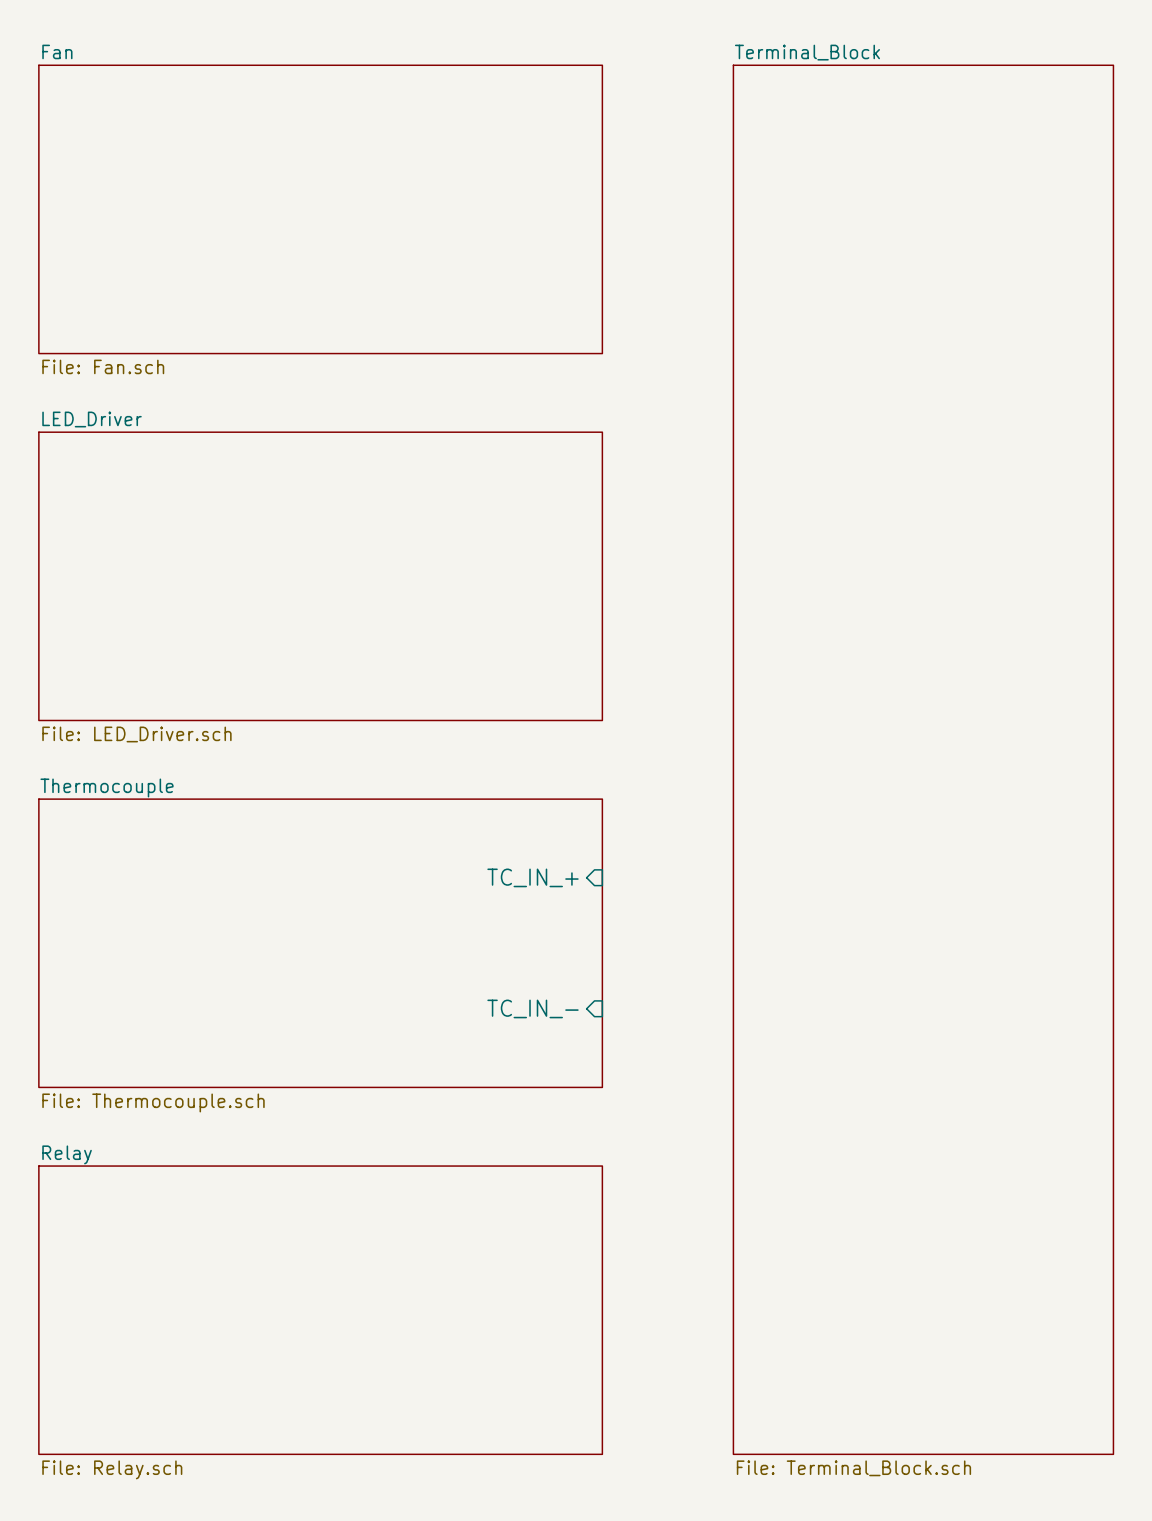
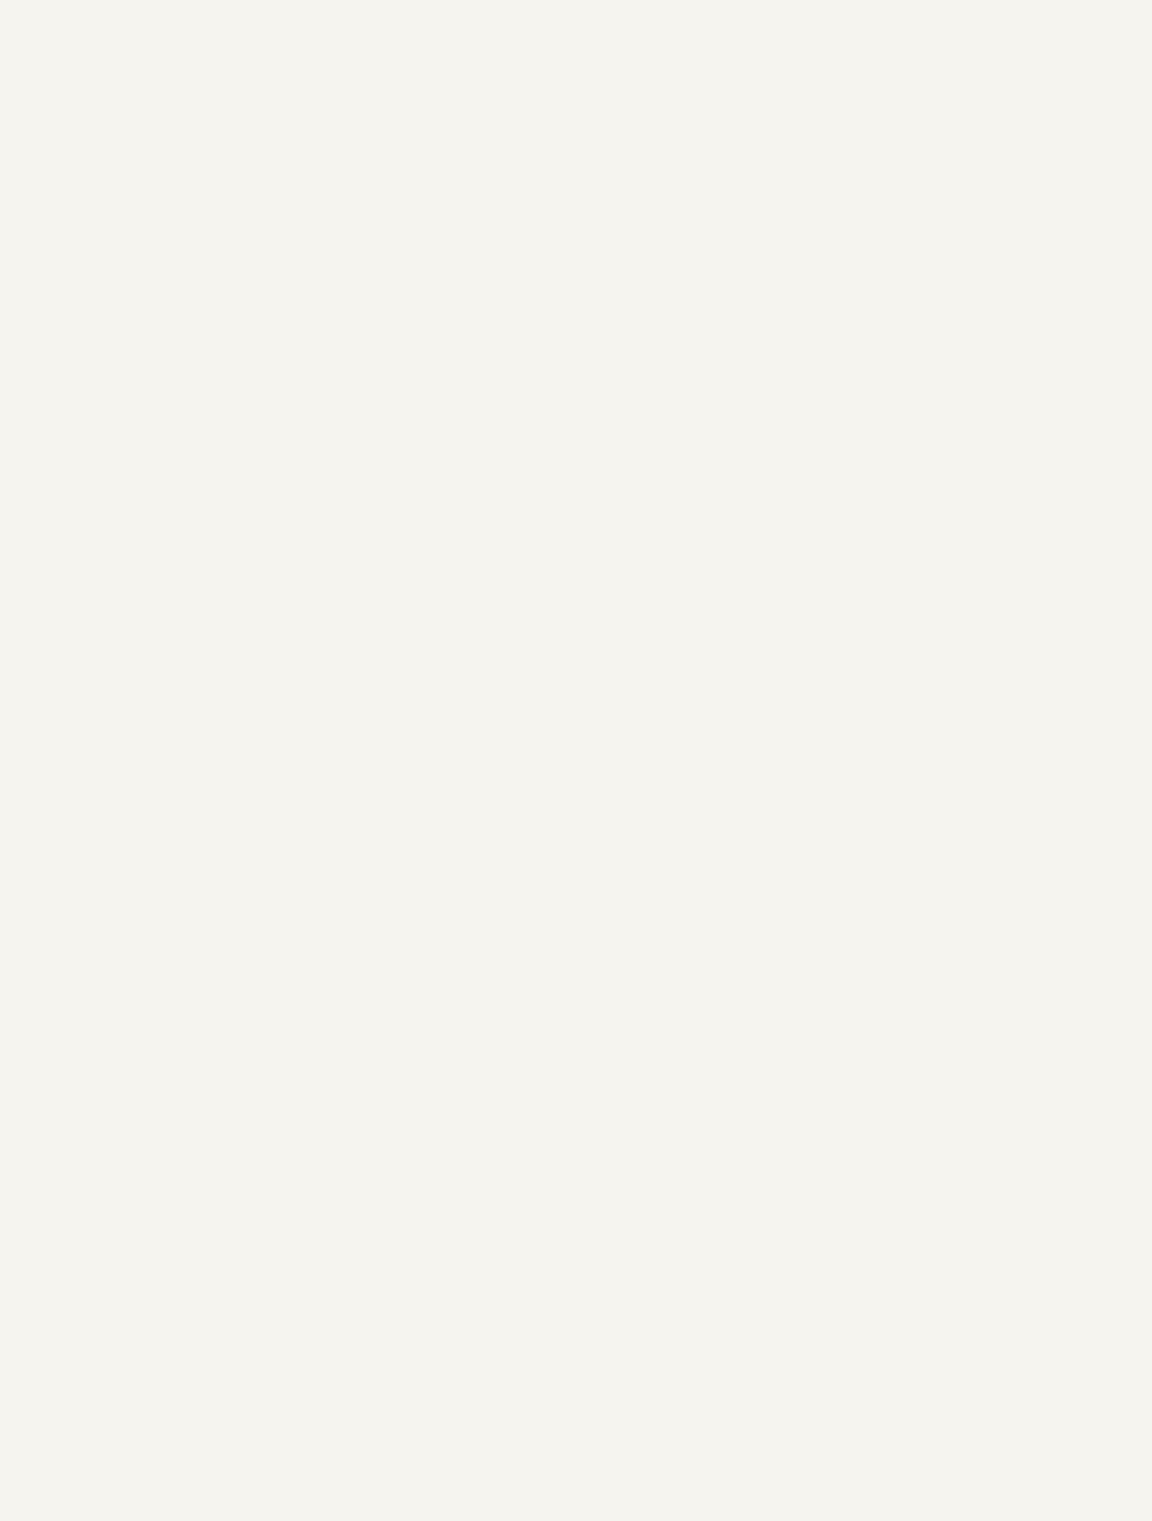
sheet Fan: File: Fan.sch (320, 209) -> none
sheet LED_Driver: File: LED_Driver.sch (320, 576) -> none
sheet Terminal_Block: File: Terminal_Block.sch (923, 759) -> none
sheet pin: TC_IN_+ (533, 877) -> none
sheet Thermocouple: File: Thermocouple.sch (320, 943) -> none
sheet pin: TC_IN_- (533, 1008) -> none
sheet Relay: File: Relay.sch (320, 1310) -> none

